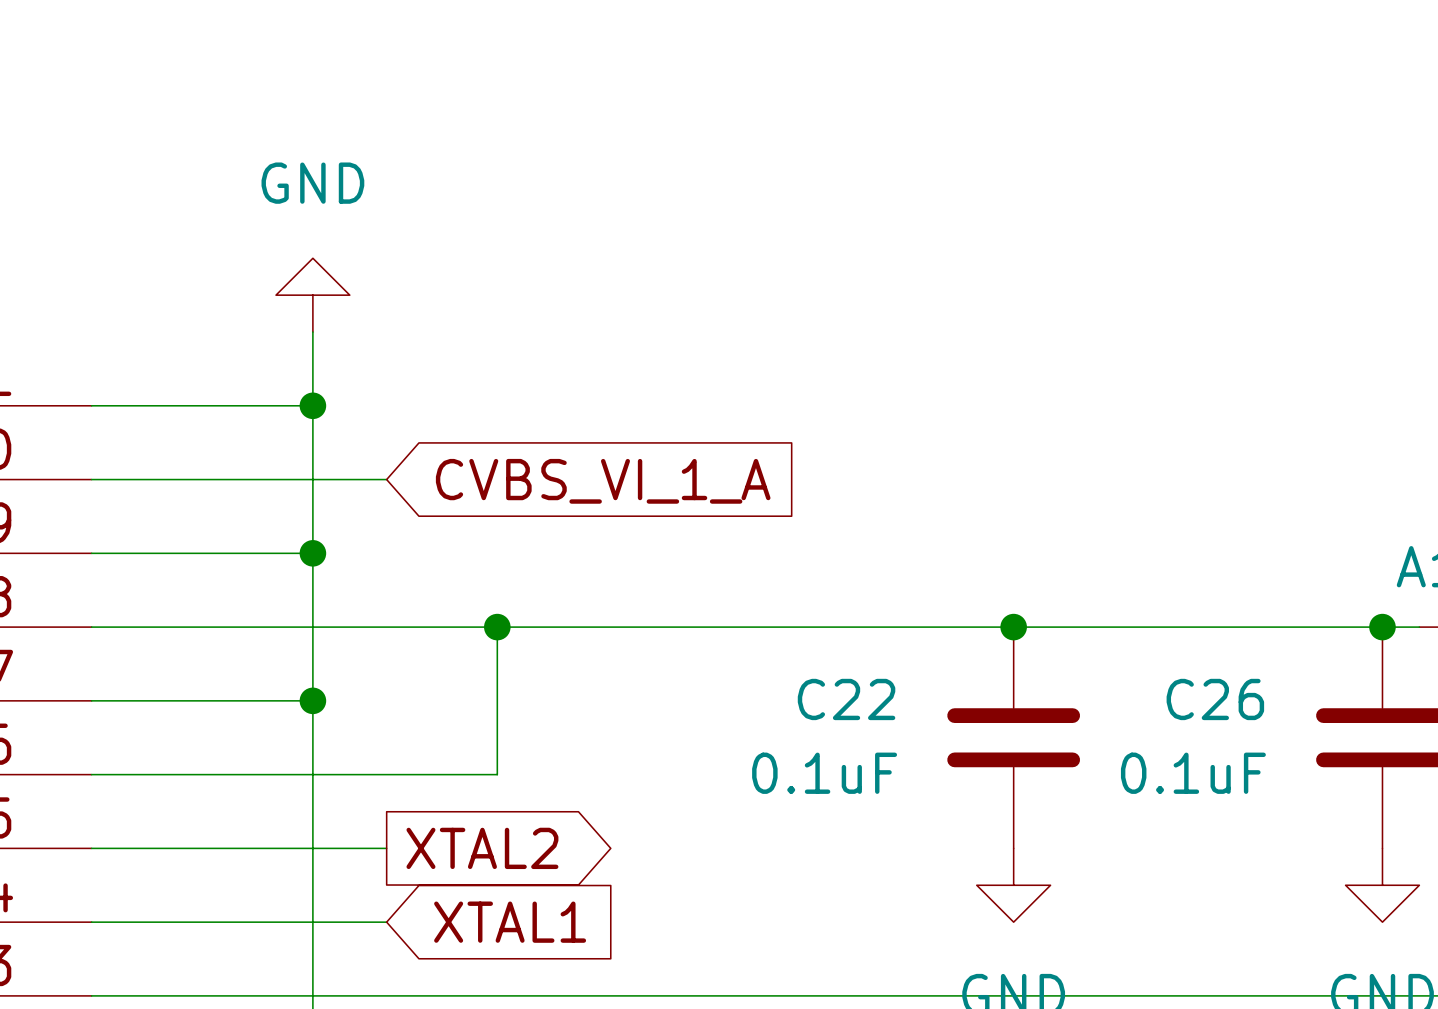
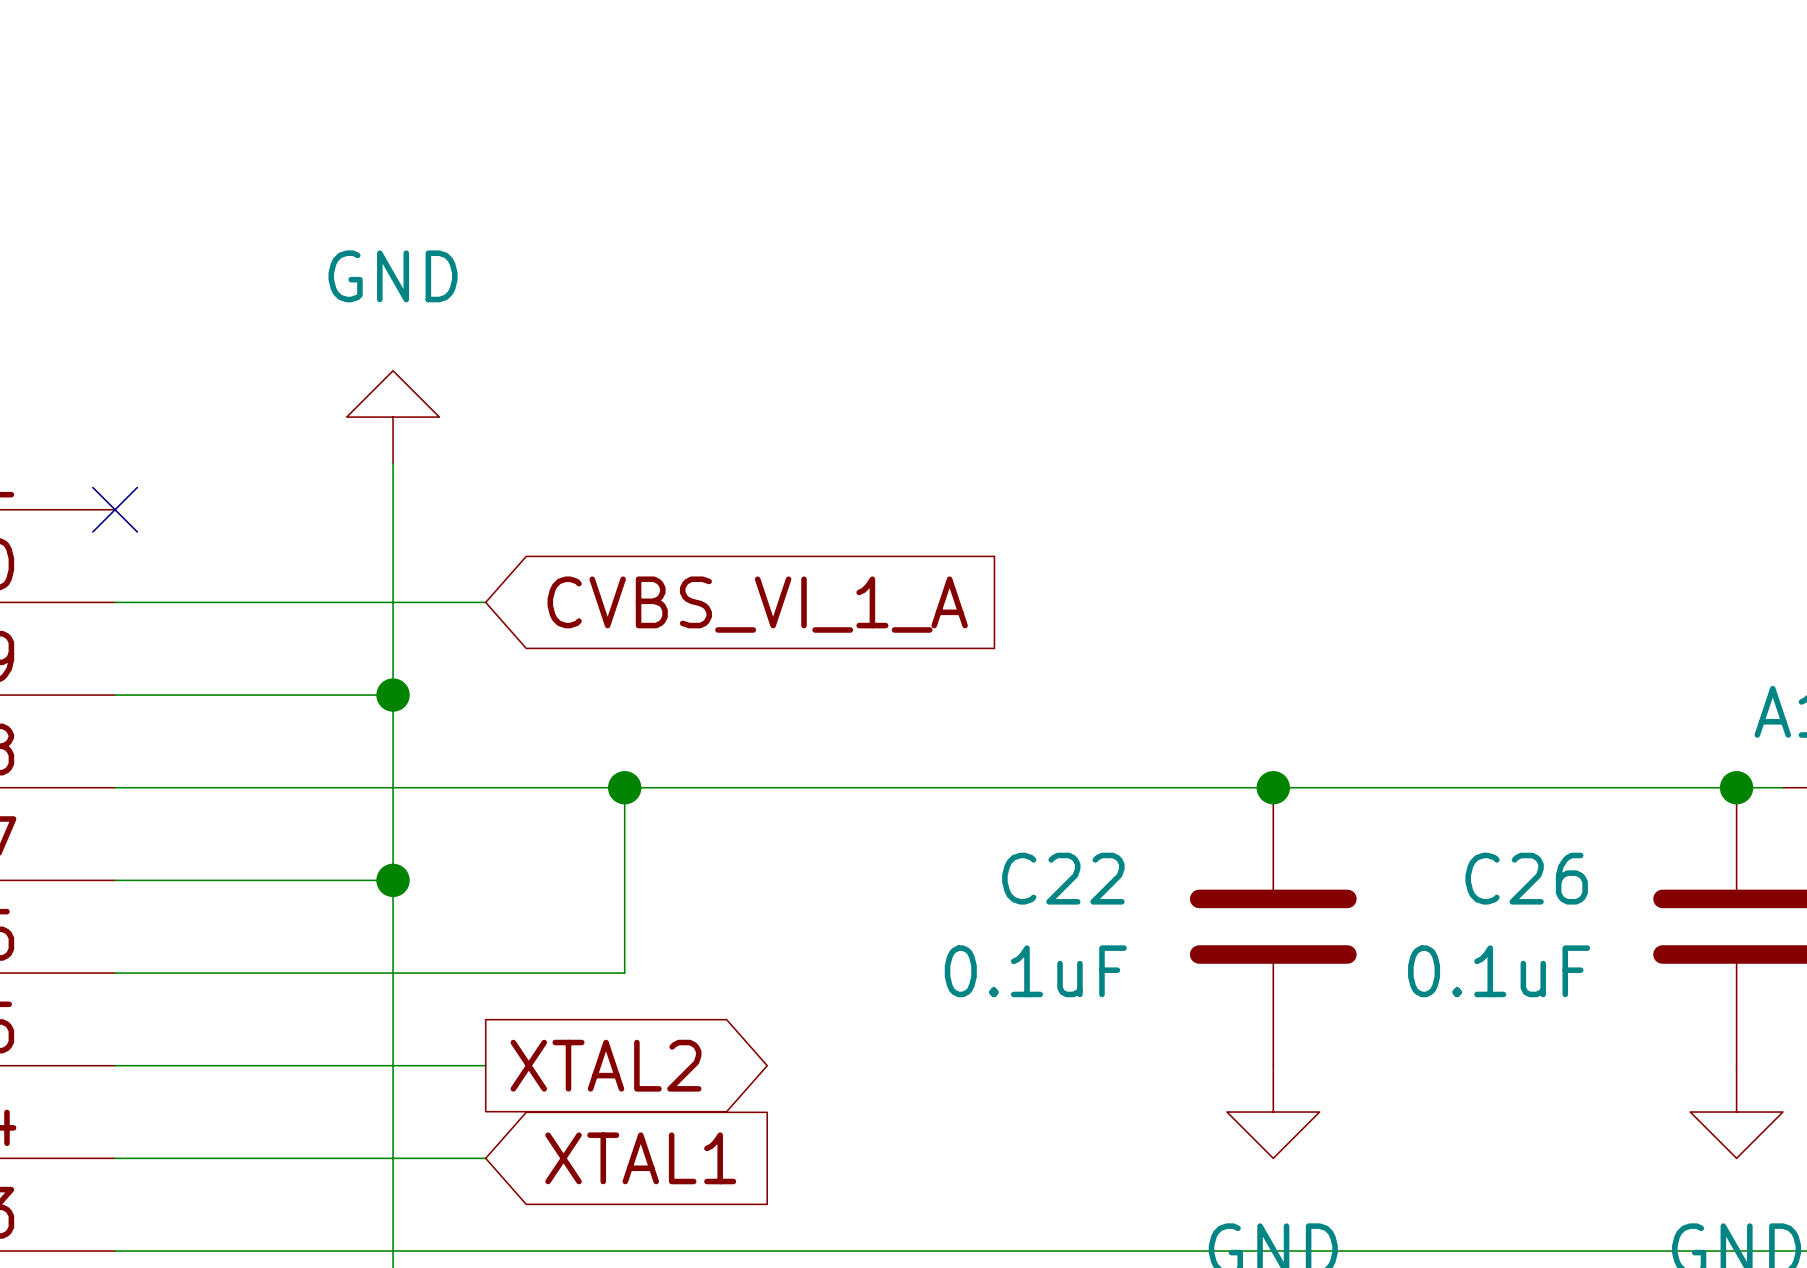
power symbol position: GND (312, 295) -> GND (393, 417)
wire: (91, 405) (312, 405) -> none
no-connect mark: none -> (115, 509)
junction: (312, 405) -> none

